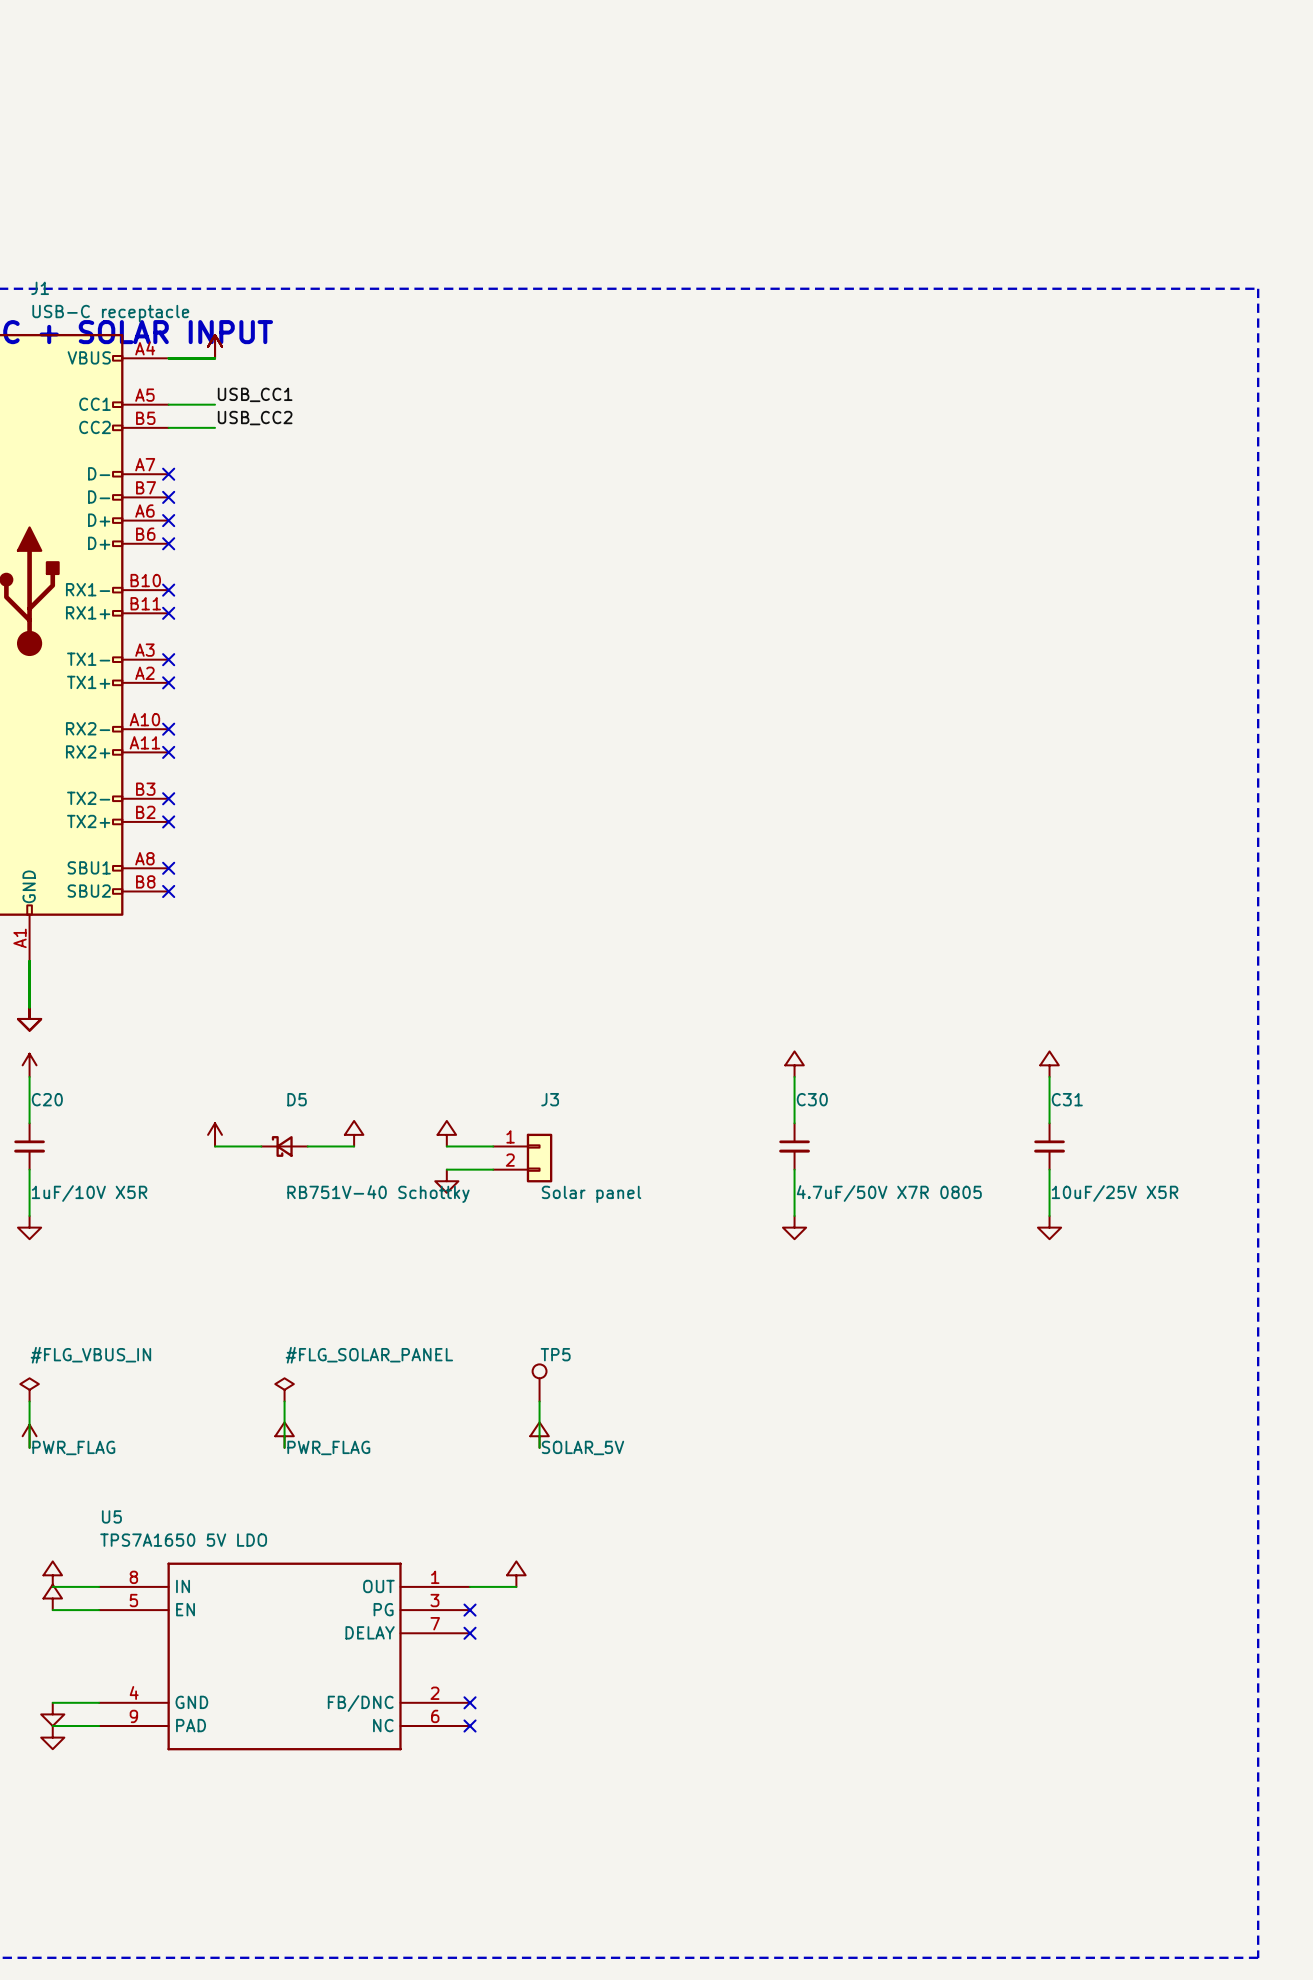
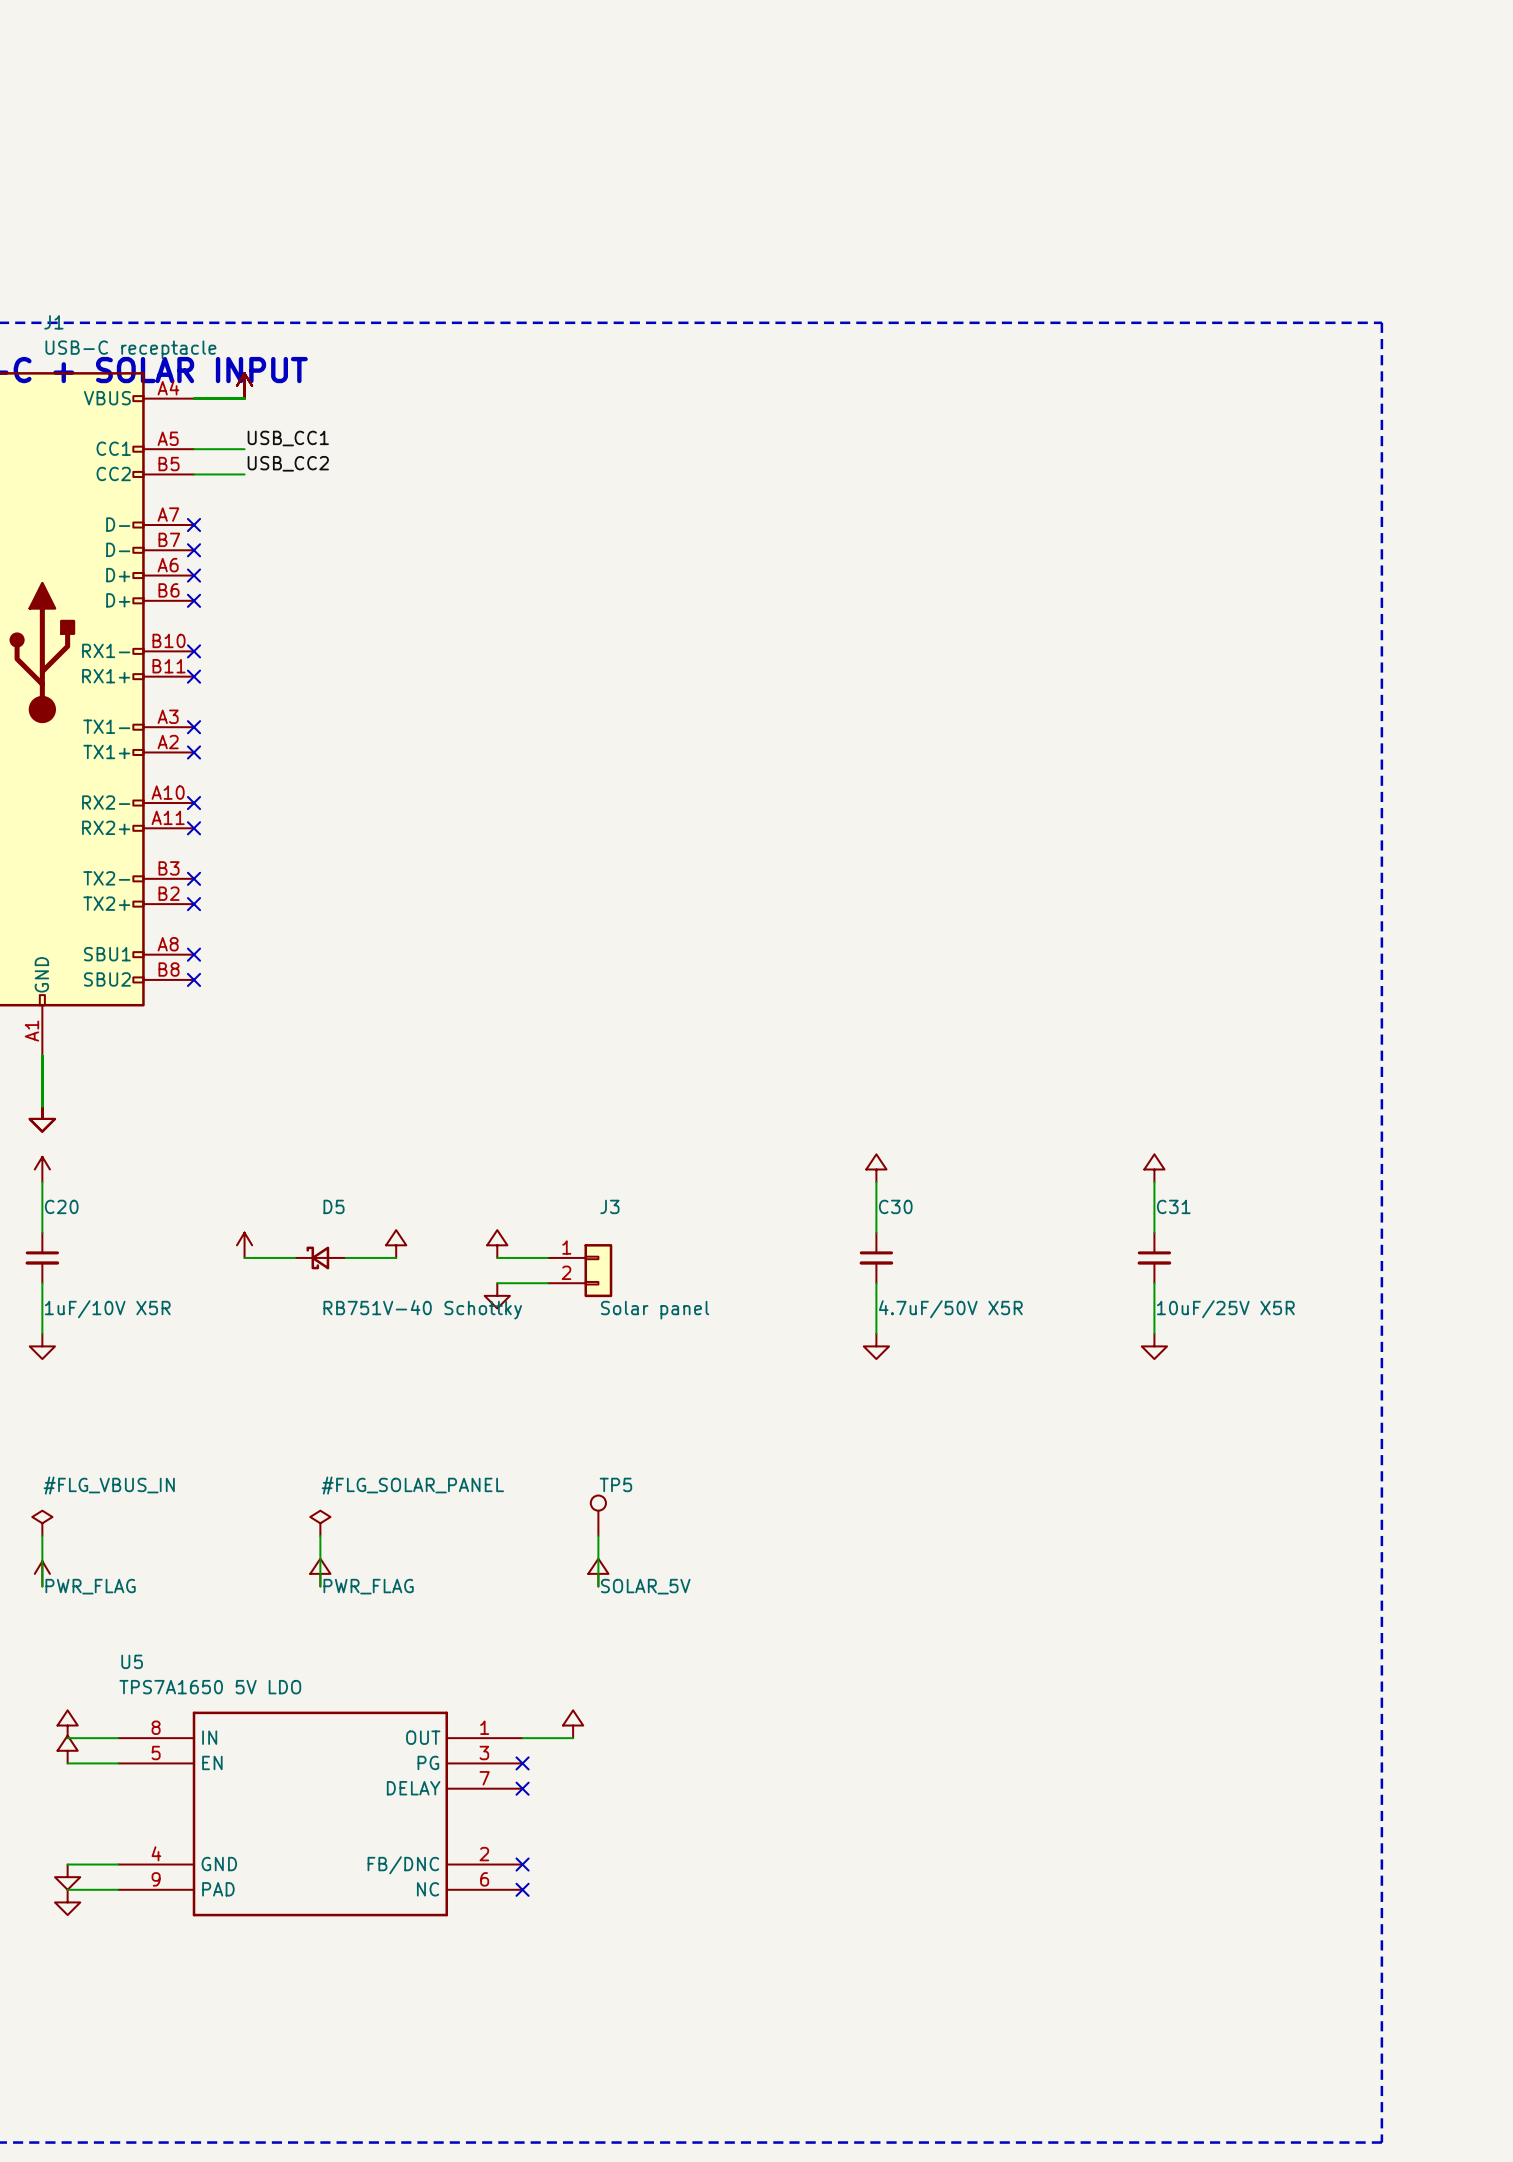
C30 value: 4.7uF/50V X7R 0805 (889, 1193) -> 4.7uF/50V X5R (950, 1309)

